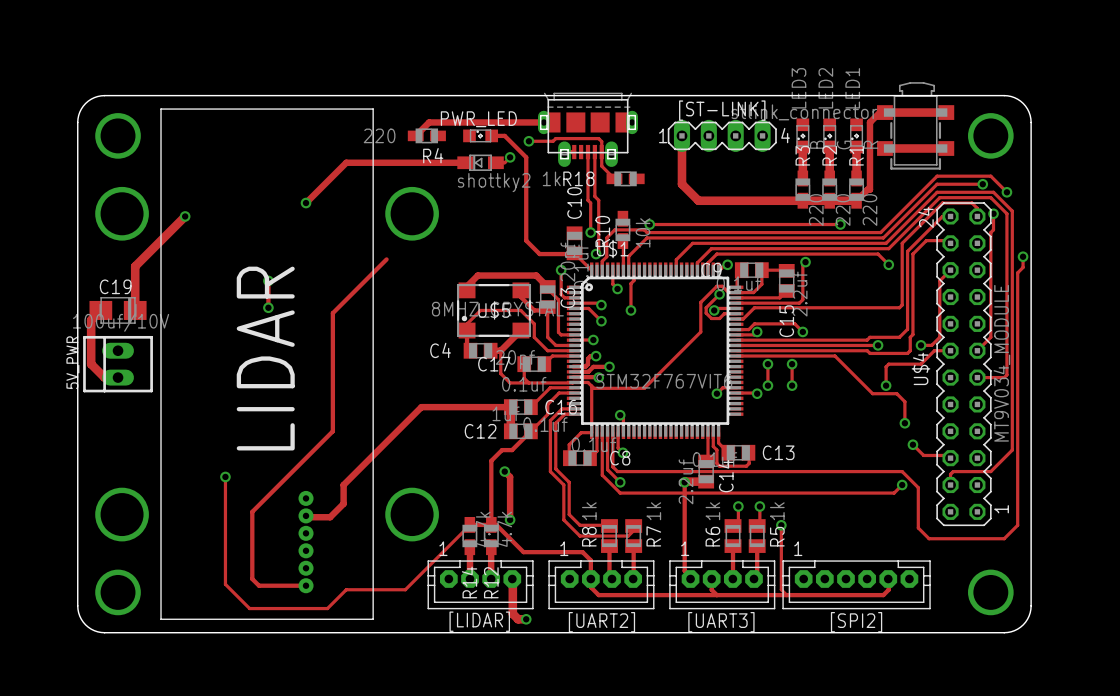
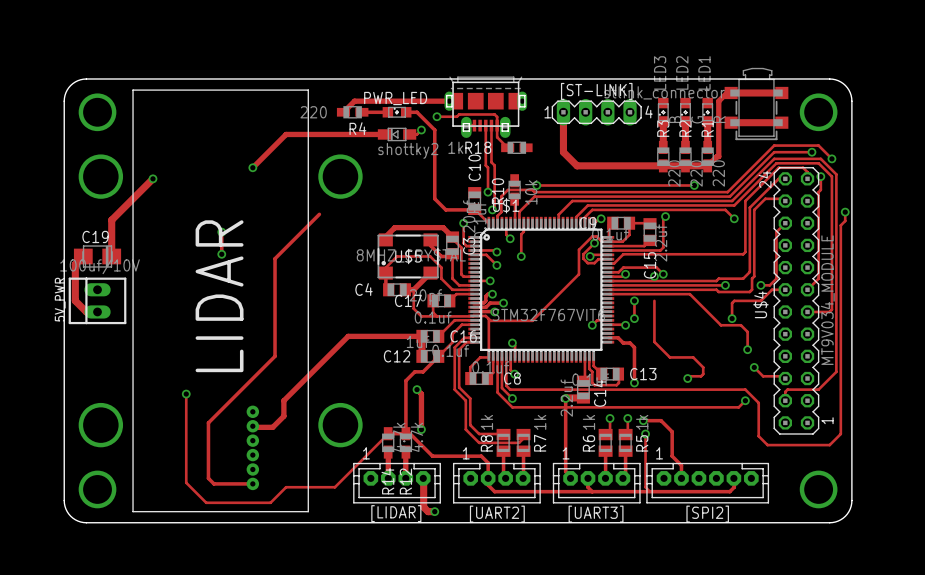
track: none -> (361, 112) (387, 112)
via: none -> (654, 276)
via: (792, 364) -> none
track: none -> (654, 318) (654, 341) (669, 357) (693, 357) (703, 367) (703, 374) (701, 376) (689, 376) (687, 378)
via: (792, 385) -> none
track: none -> (608, 337) (618, 337) (623, 343) (630, 343) (634, 347) (634, 382)
via: none -> (687, 378)
via: none -> (634, 382)
track: none -> (643, 420) (661, 420) (672, 431) (672, 456) (681, 465) (681, 478)
via: none -> (643, 420)

